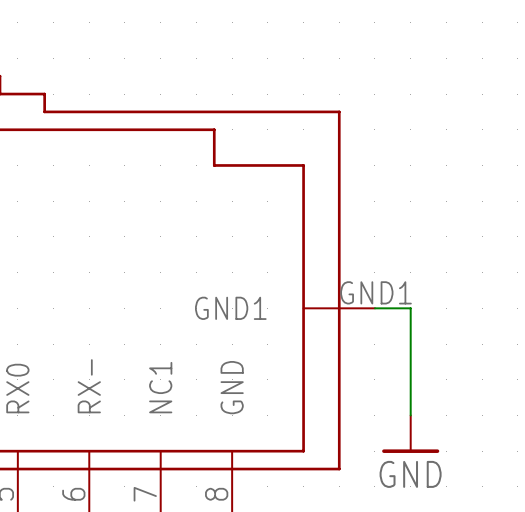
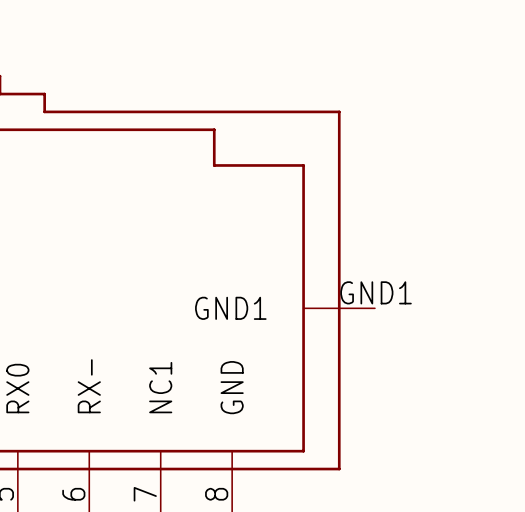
wire: (374, 308) (410, 308) (410, 415) -> none
power symbol: GND (410, 434) -> none

